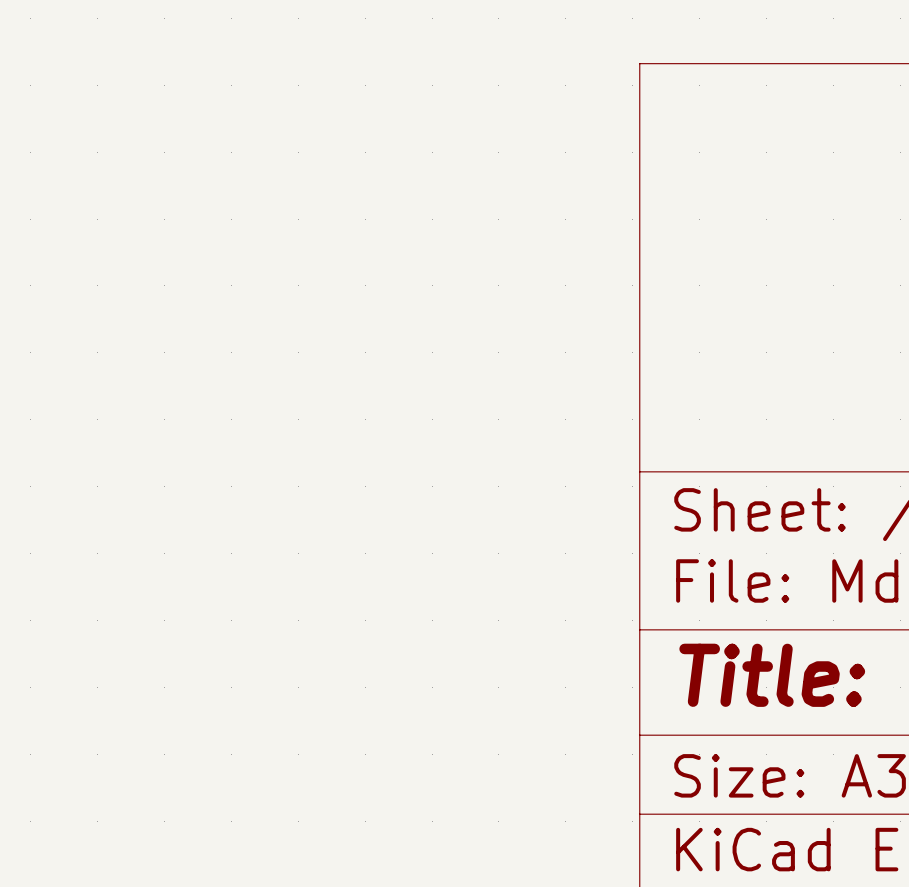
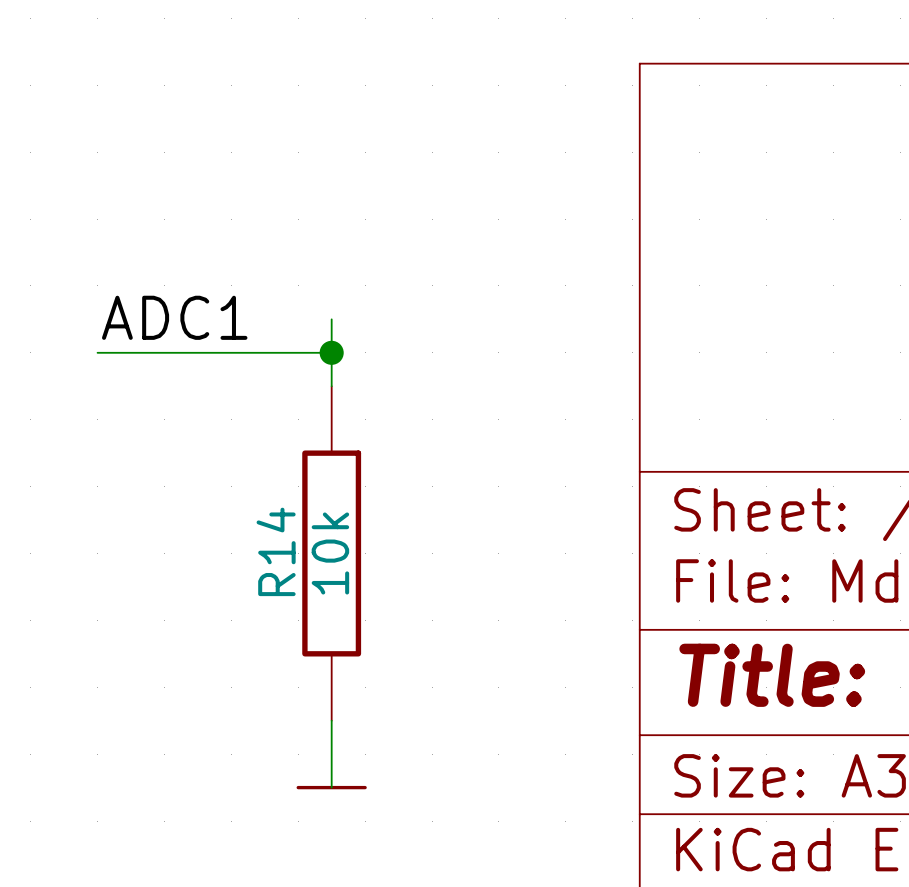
label: none -> ADC1 (174, 317)
wire: none -> (331, 319) (331, 386)
wire: none -> (97, 352) (331, 352)
junction: none -> (331, 352)
R14: none -> 10k (331, 553)
wire: none -> (331, 720) (331, 787)
power symbol: none -> (331, 787)

